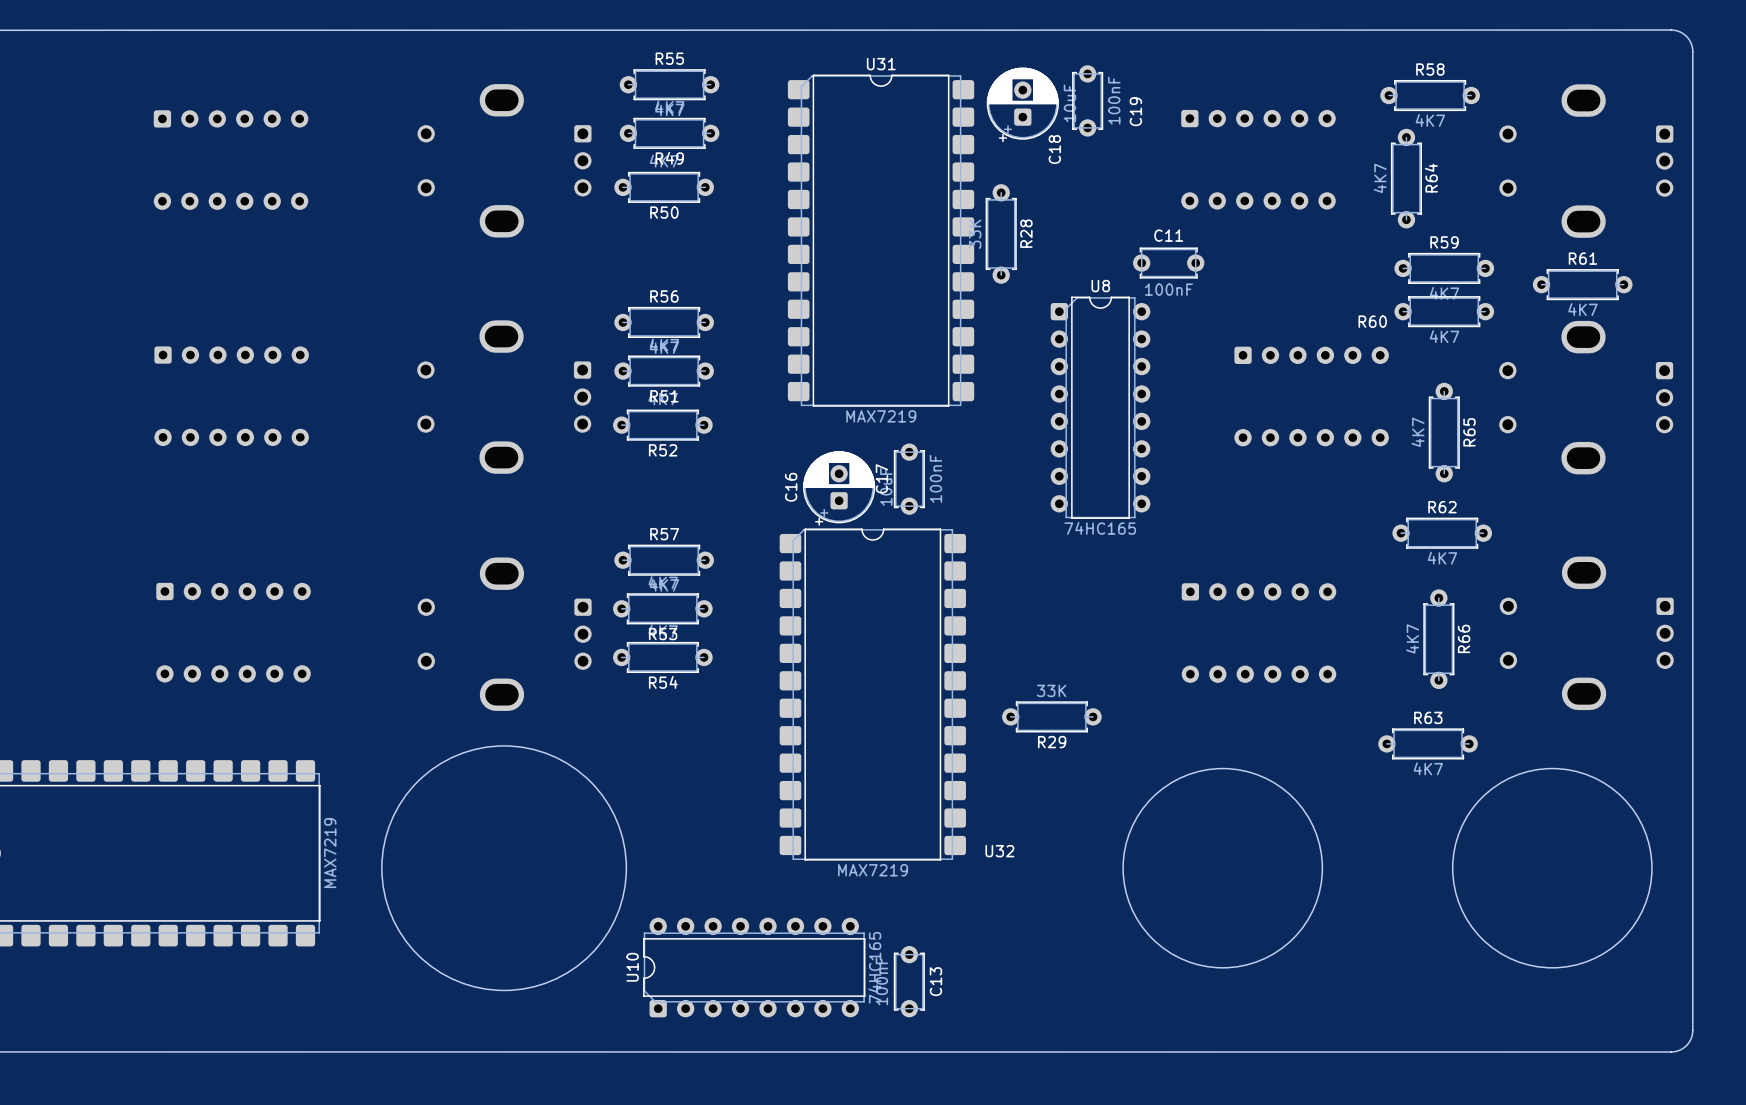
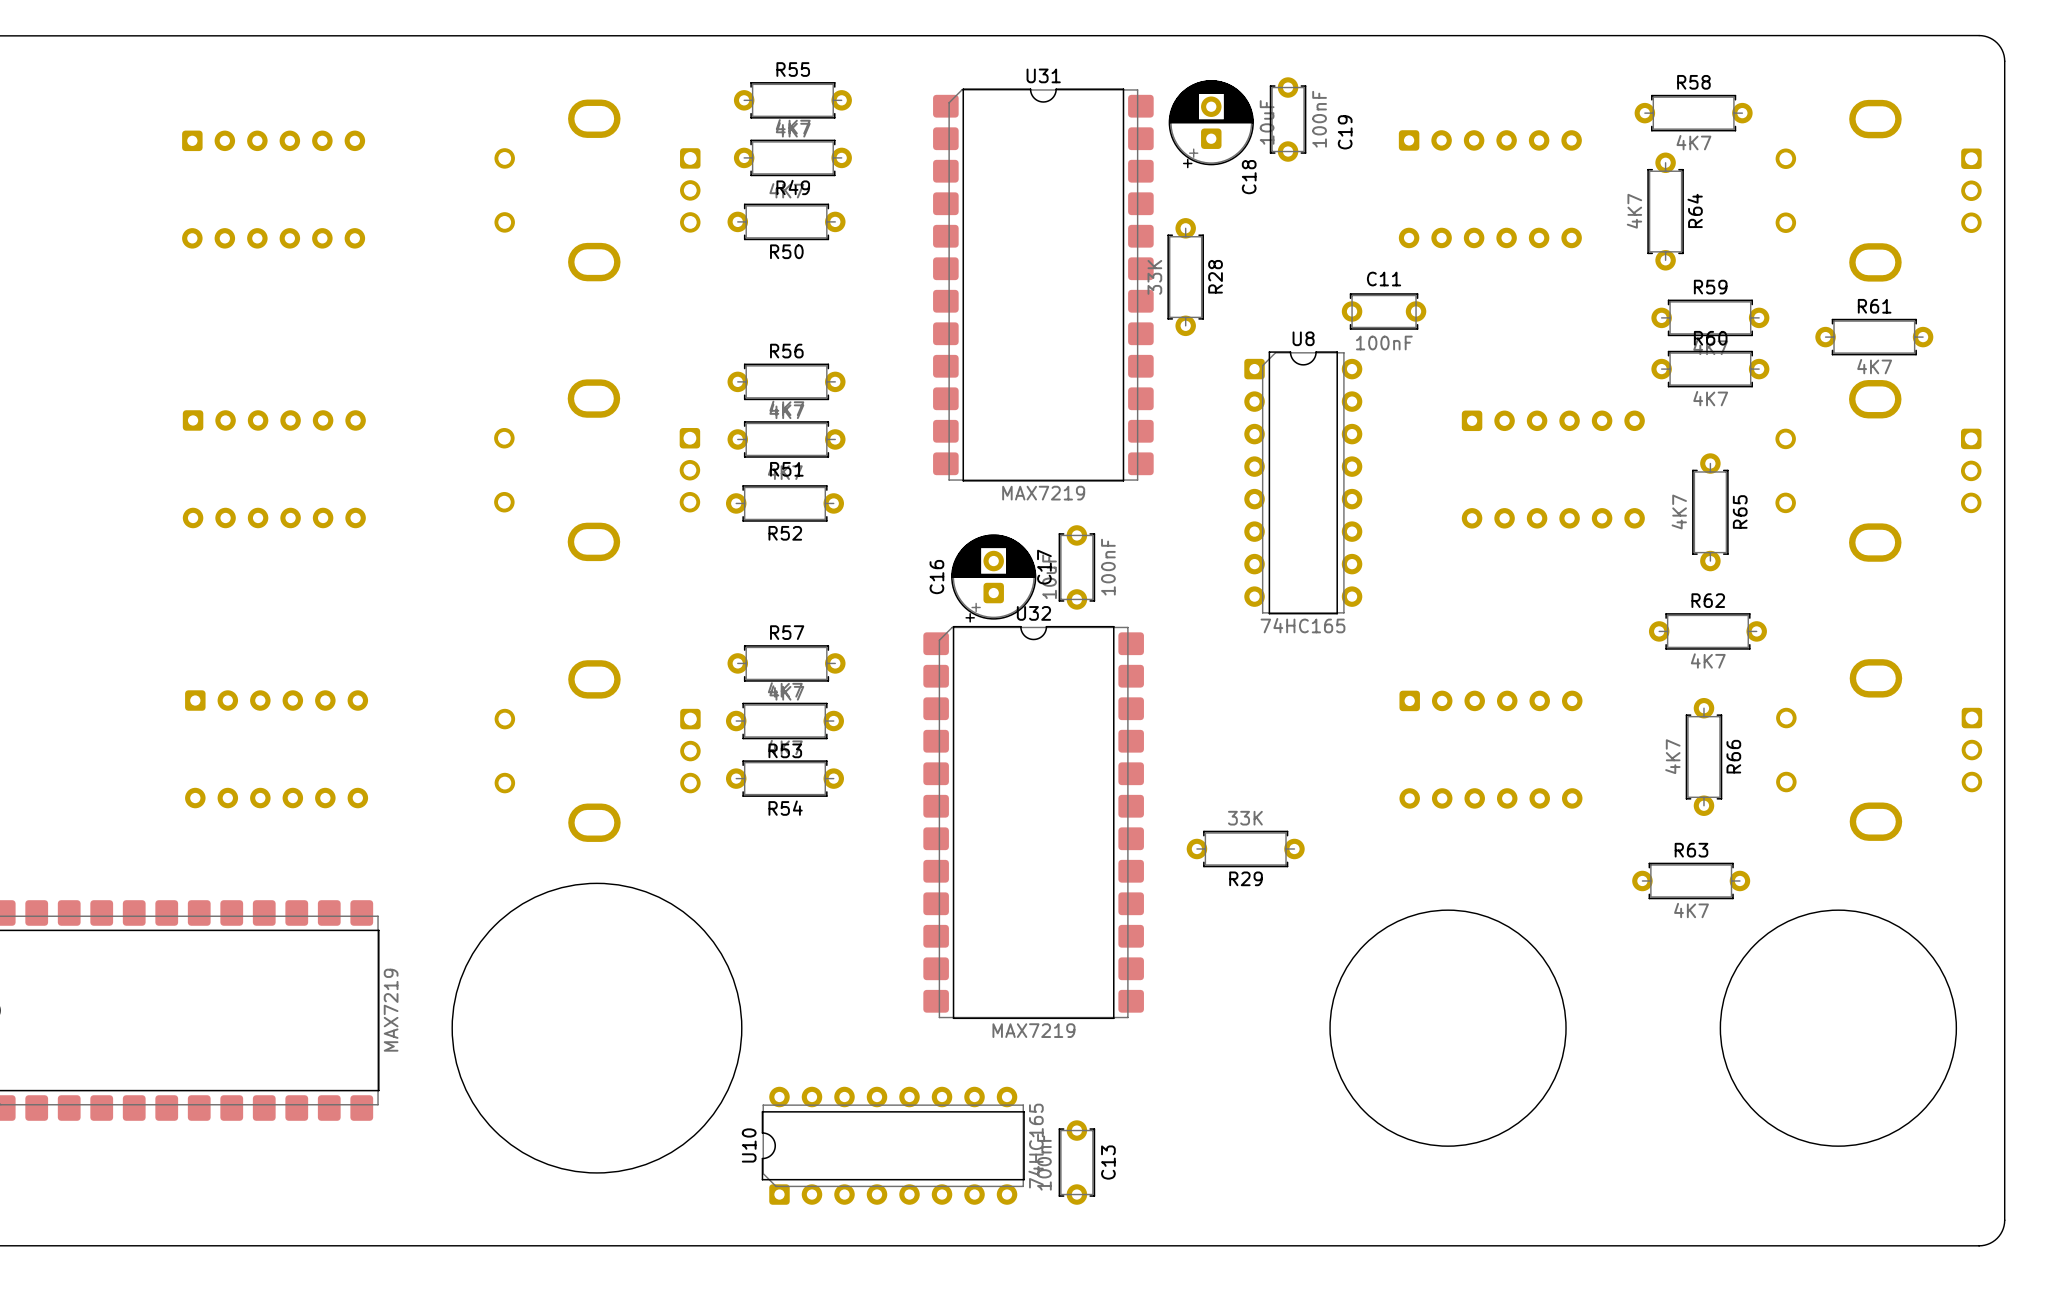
R60 name position: R60 (1372, 321) -> R60 (1710, 338)
U32 name position: U32 (999, 851) -> U32 (1033, 613)

